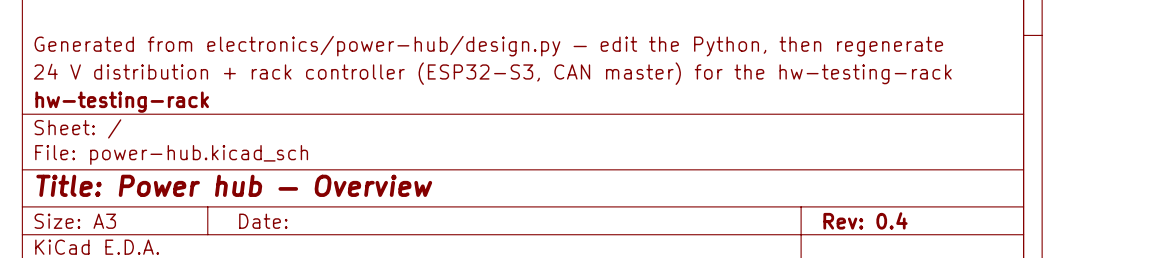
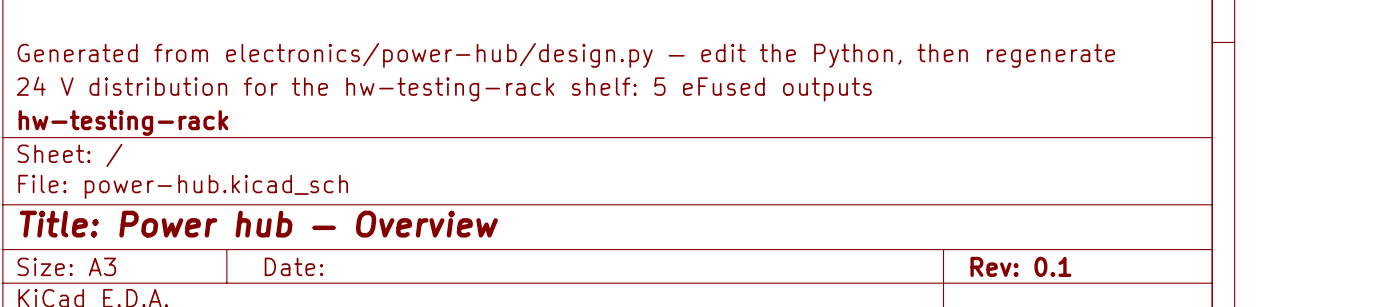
title block: 24 V distribution + rack controller (ESP32-S3, CAN master) for the hw-testing-rack (492, 73) -> 24 V distribution for the hw-testing-rack shelf: 5 eFused outputs (444, 88)
title block: Rev: 0.4 (865, 220) -> Rev: 0.1 (1020, 266)

